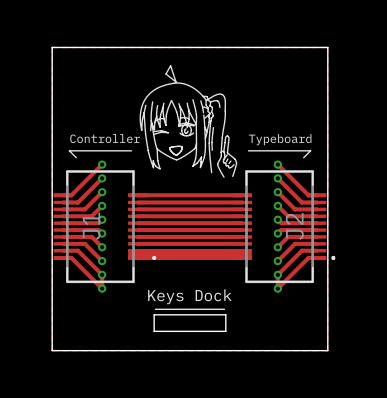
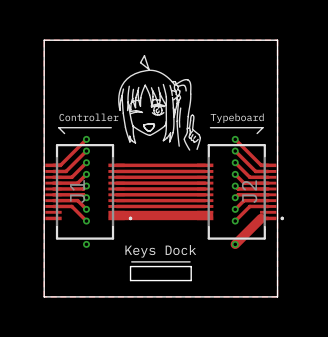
track: (63, 250) (78, 250) (102, 274) (102, 288) (71, 257) (63, 257) -> none
track: (316, 250) (301, 250) (277, 274) (277, 288) -> none
track width: thin (308, 257) (277, 288) -> thick (261, 218) (235, 244)
via: (102, 274) -> none
via: (277, 274) -> none

